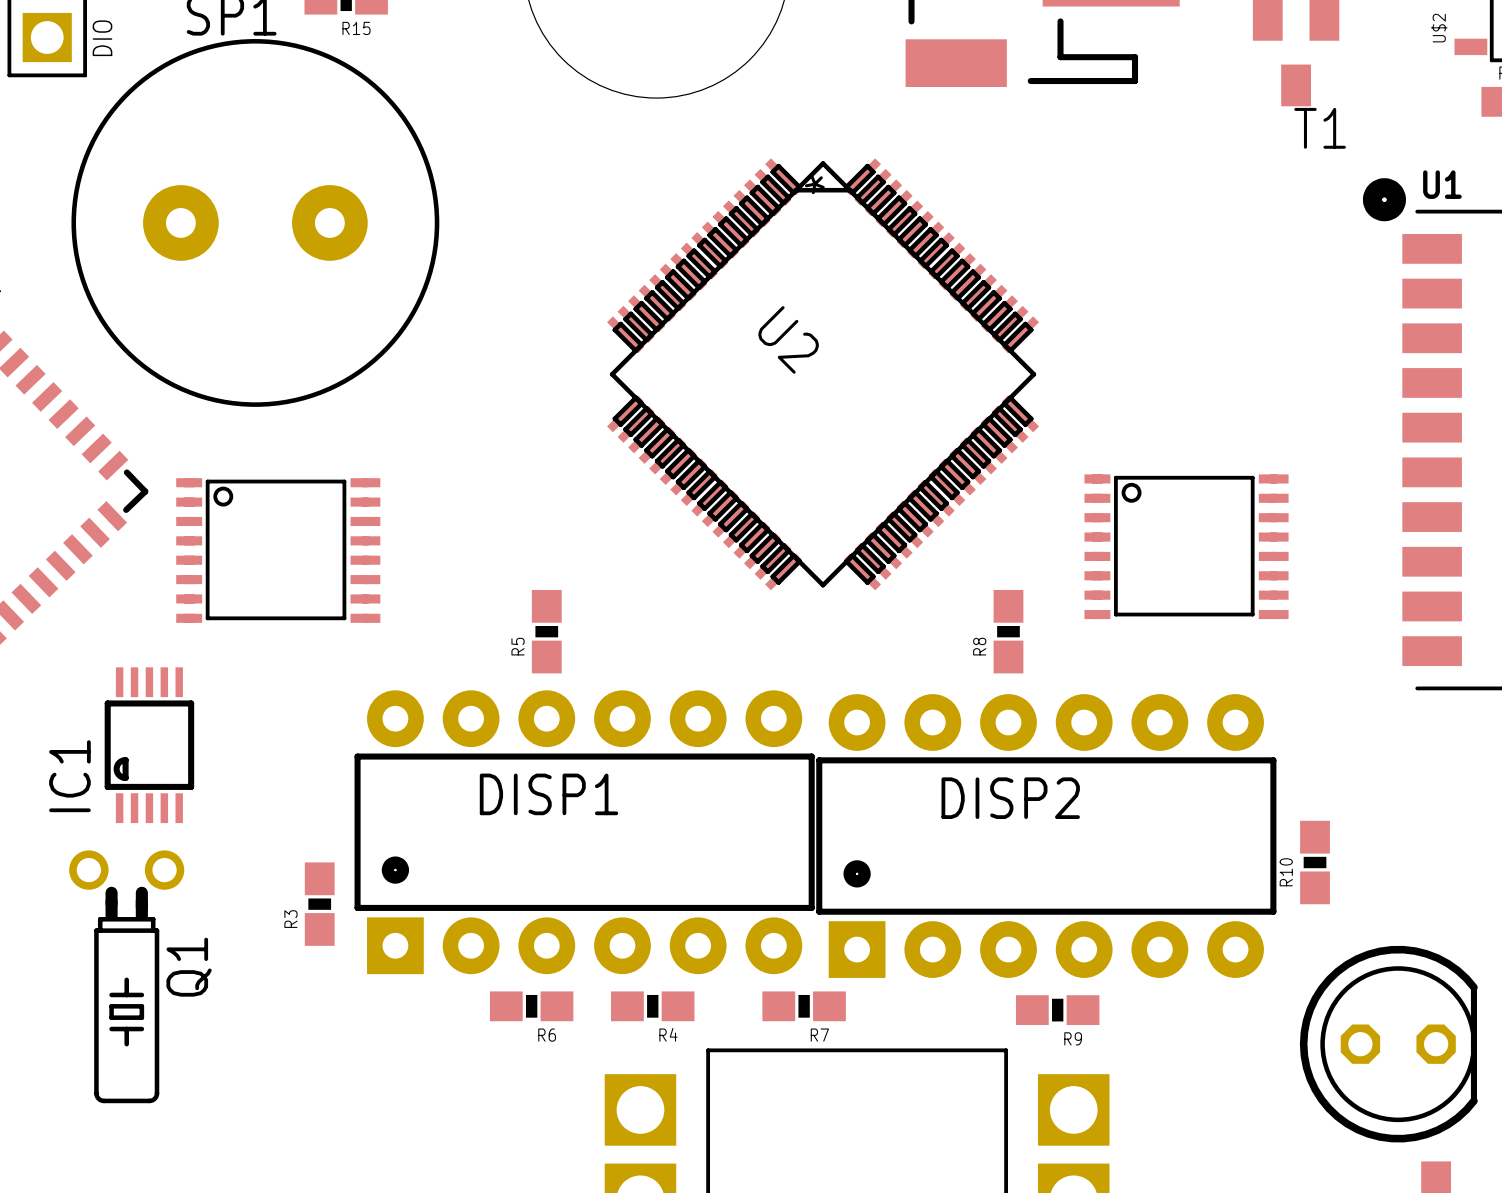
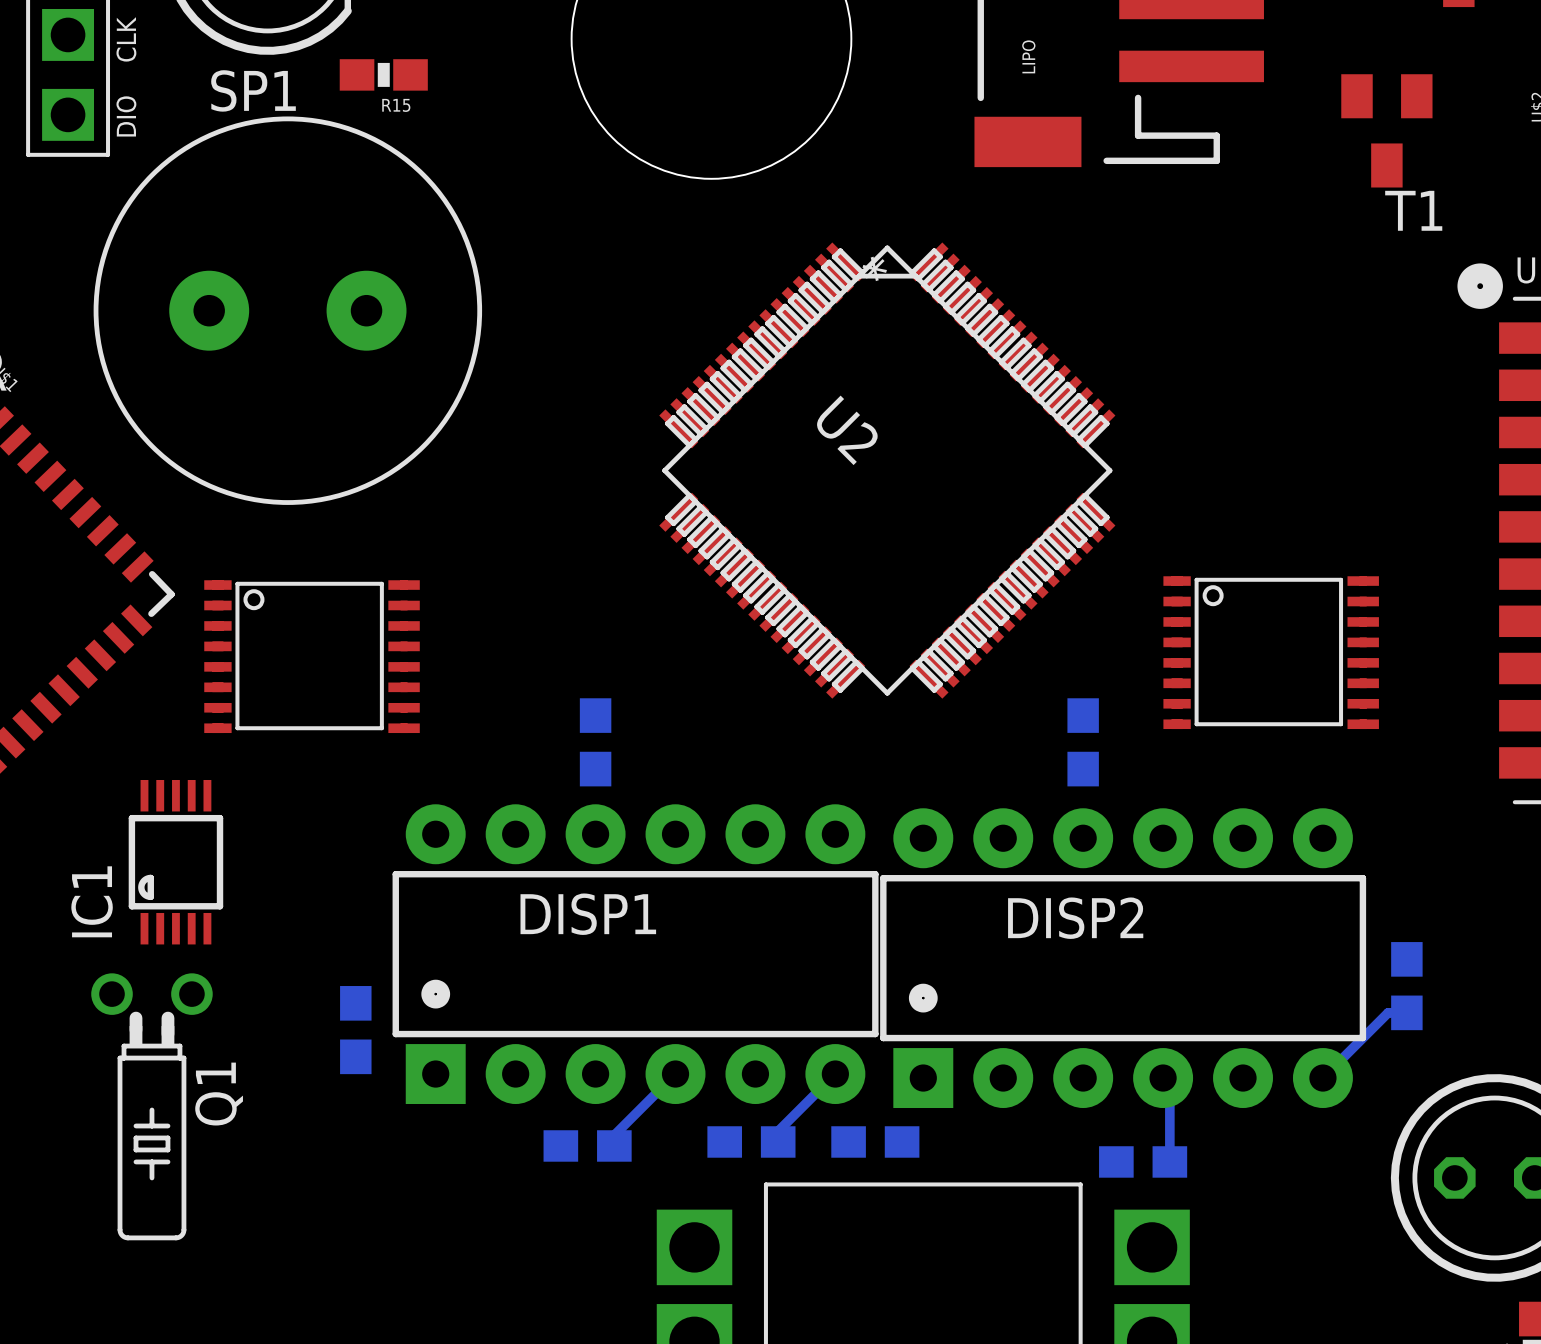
R5 side: top (546, 631) -> bottom (595, 742)
R8 side: top (1008, 631) -> bottom (1083, 742)
R10 side: top (1315, 862) -> bottom (1406, 986)
bottom track: none -> (1406, 1012) (1388, 1012) (1322, 1078)
R3 side: top (319, 904) -> bottom (355, 1030)
bottom track: none -> (675, 1074) (614, 1135) (614, 1145)
bottom track: none -> (835, 1074) (778, 1131) (778, 1141)
bottom track: none -> (1163, 1078) (1169, 1084) (1169, 1161)
R6 side: top (531, 1006) -> bottom (587, 1145)
R4 side: top (652, 1006) -> bottom (751, 1141)
R7 side: top (804, 1006) -> bottom (875, 1141)
R9 side: top (1057, 1010) -> bottom (1143, 1161)

